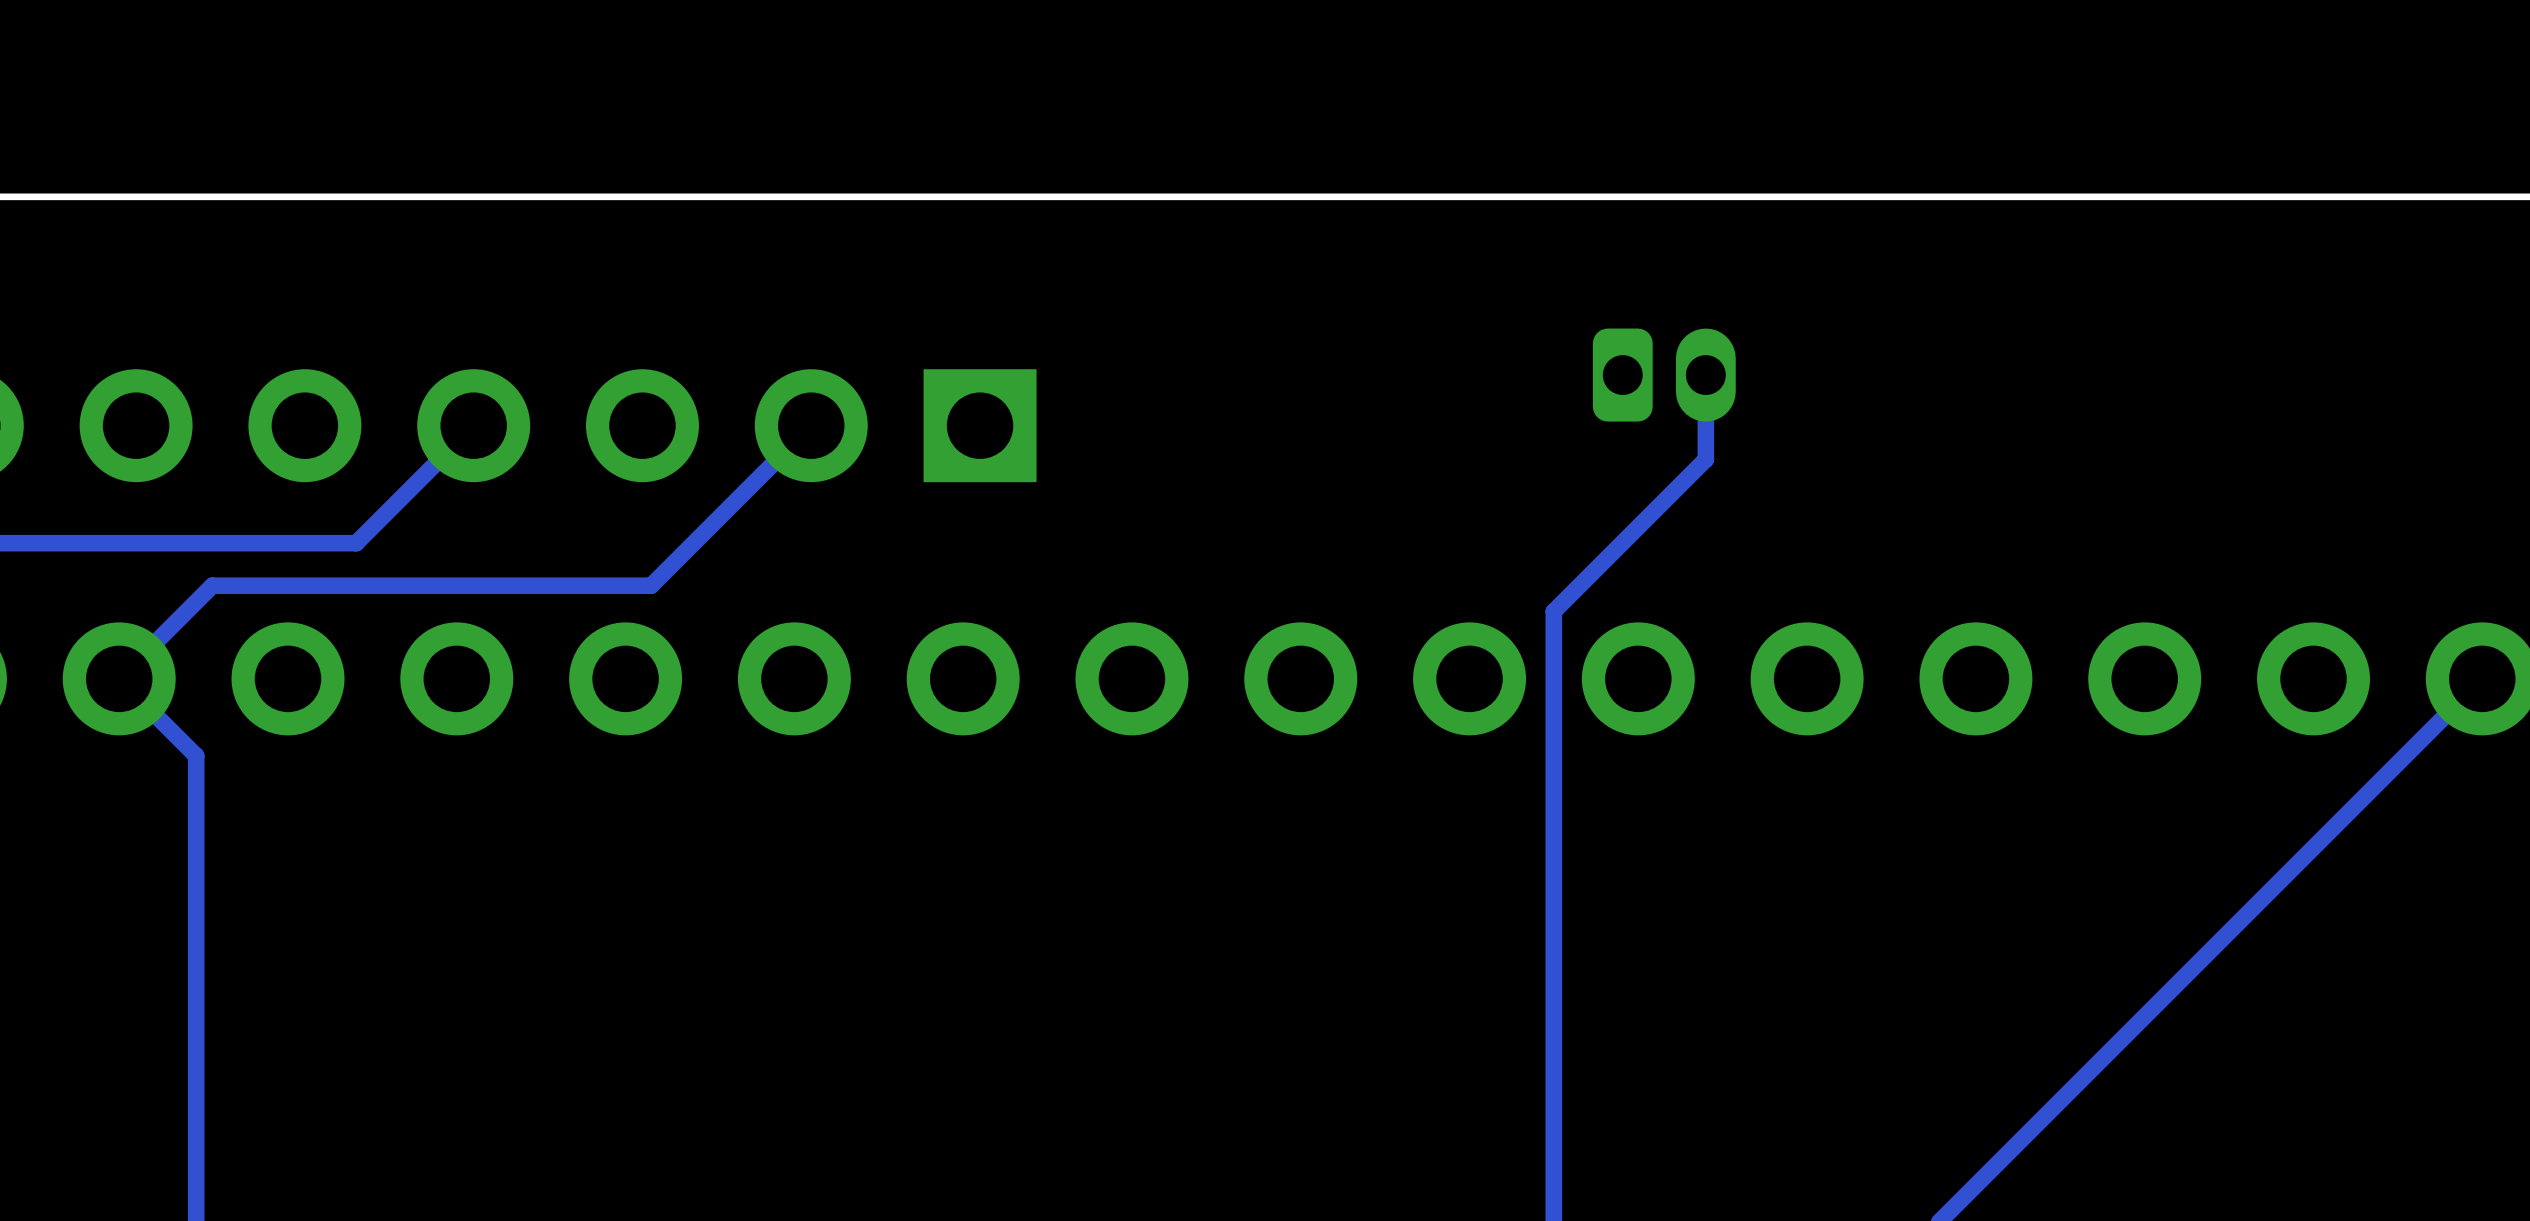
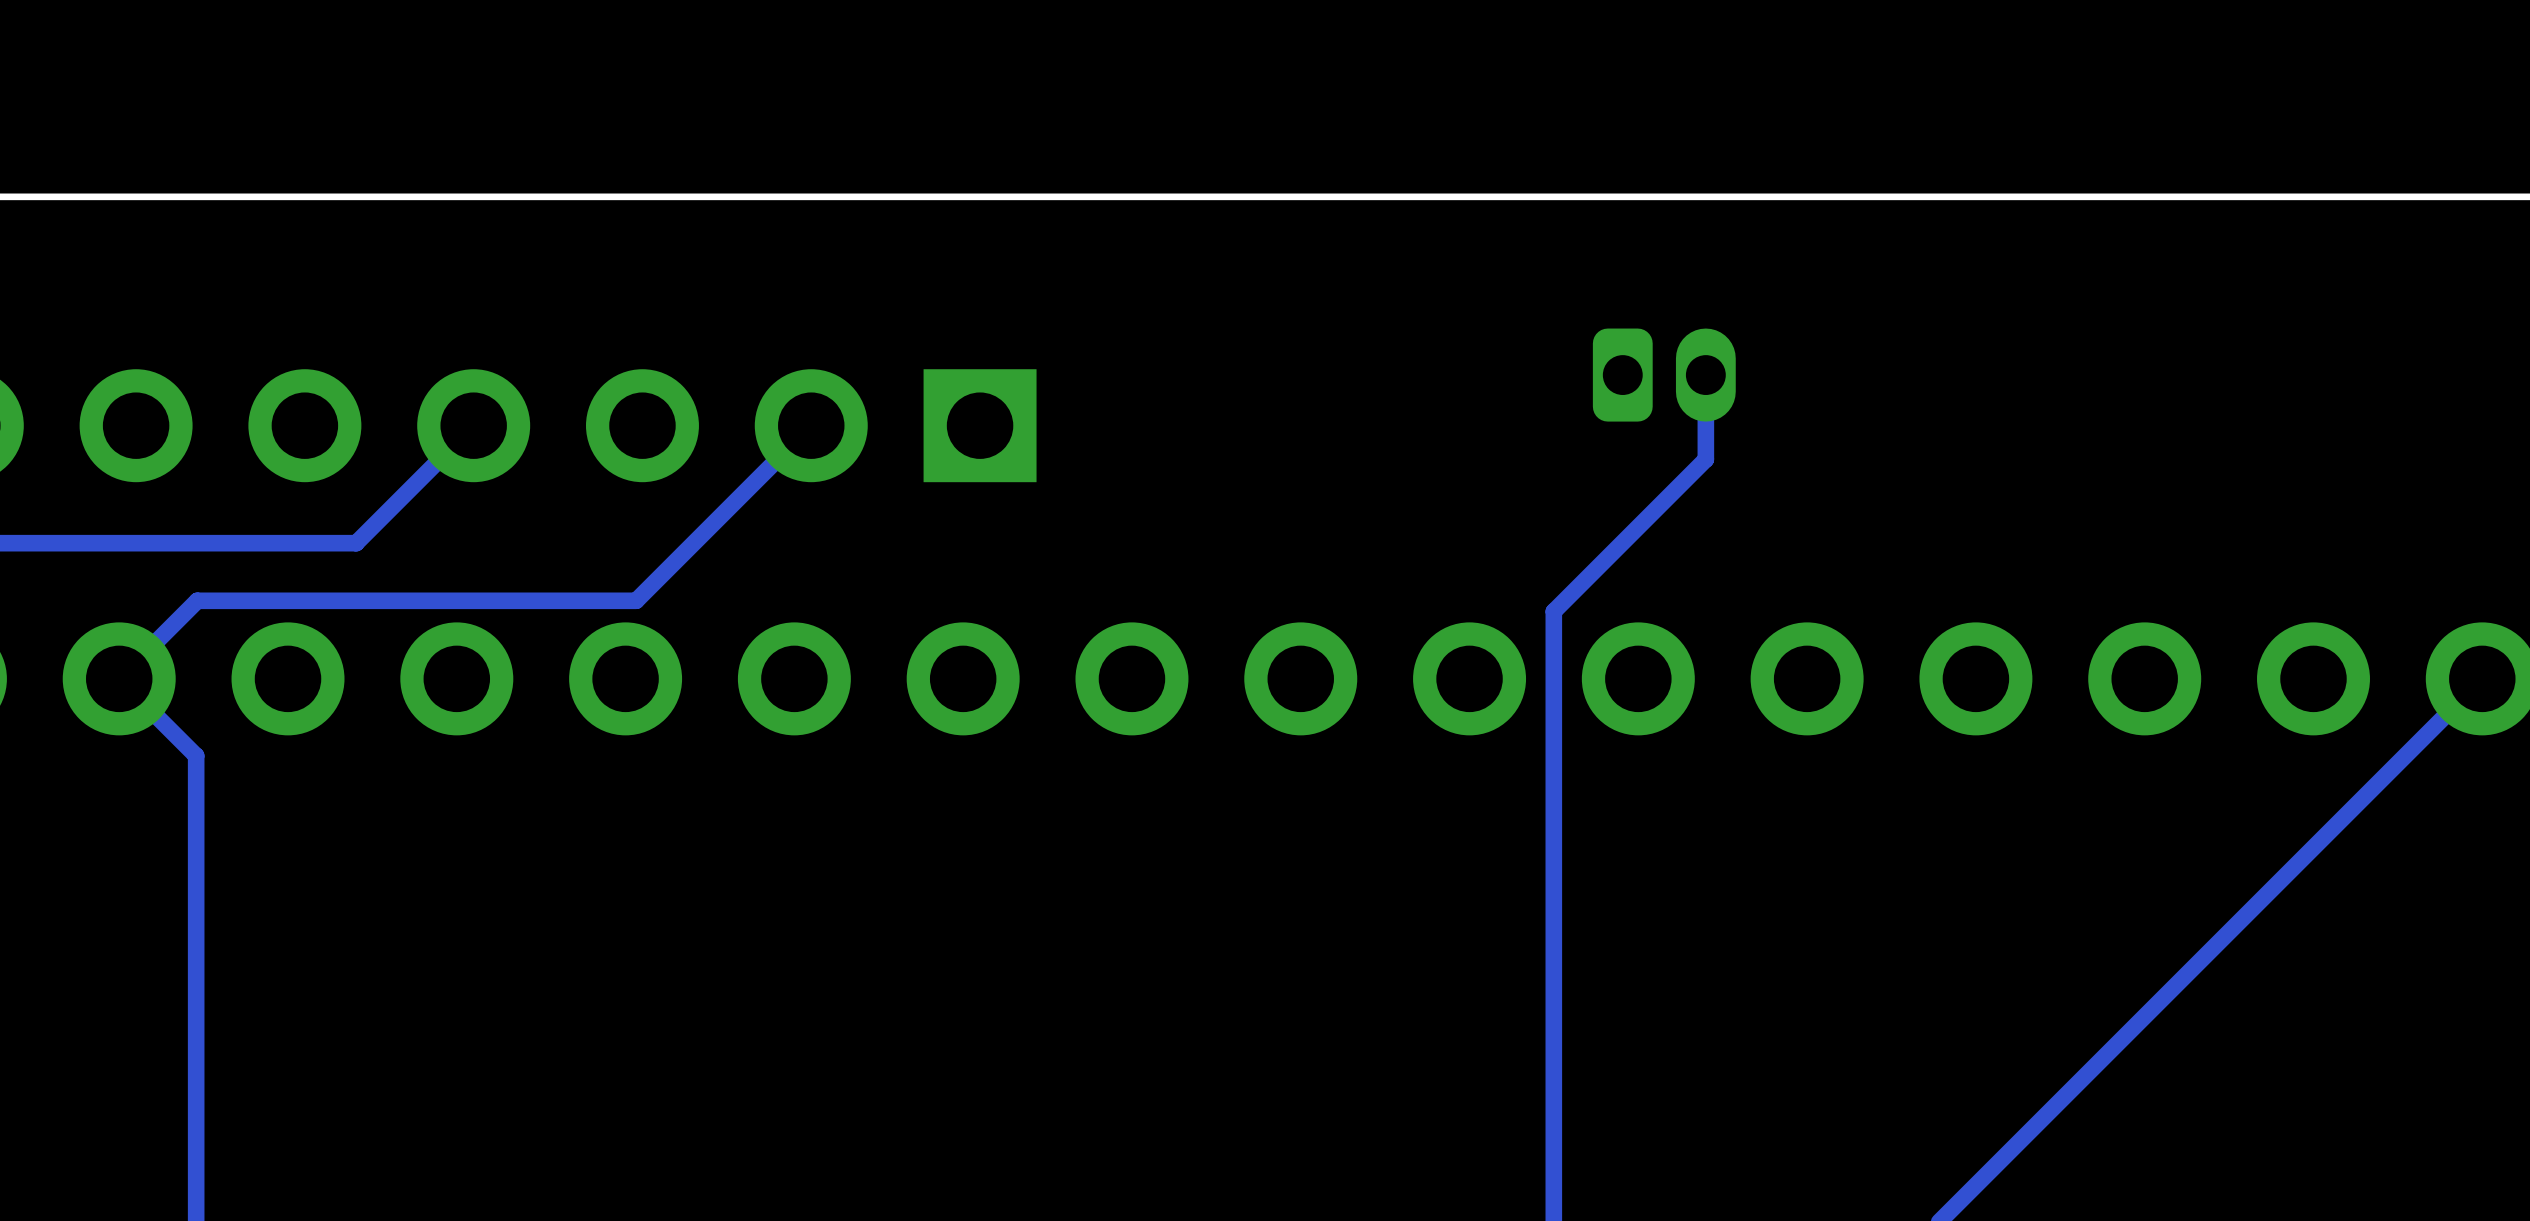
track: (651, 585) (212, 585) (197, 600) -> (651, 585) (636, 600) (197, 600)

